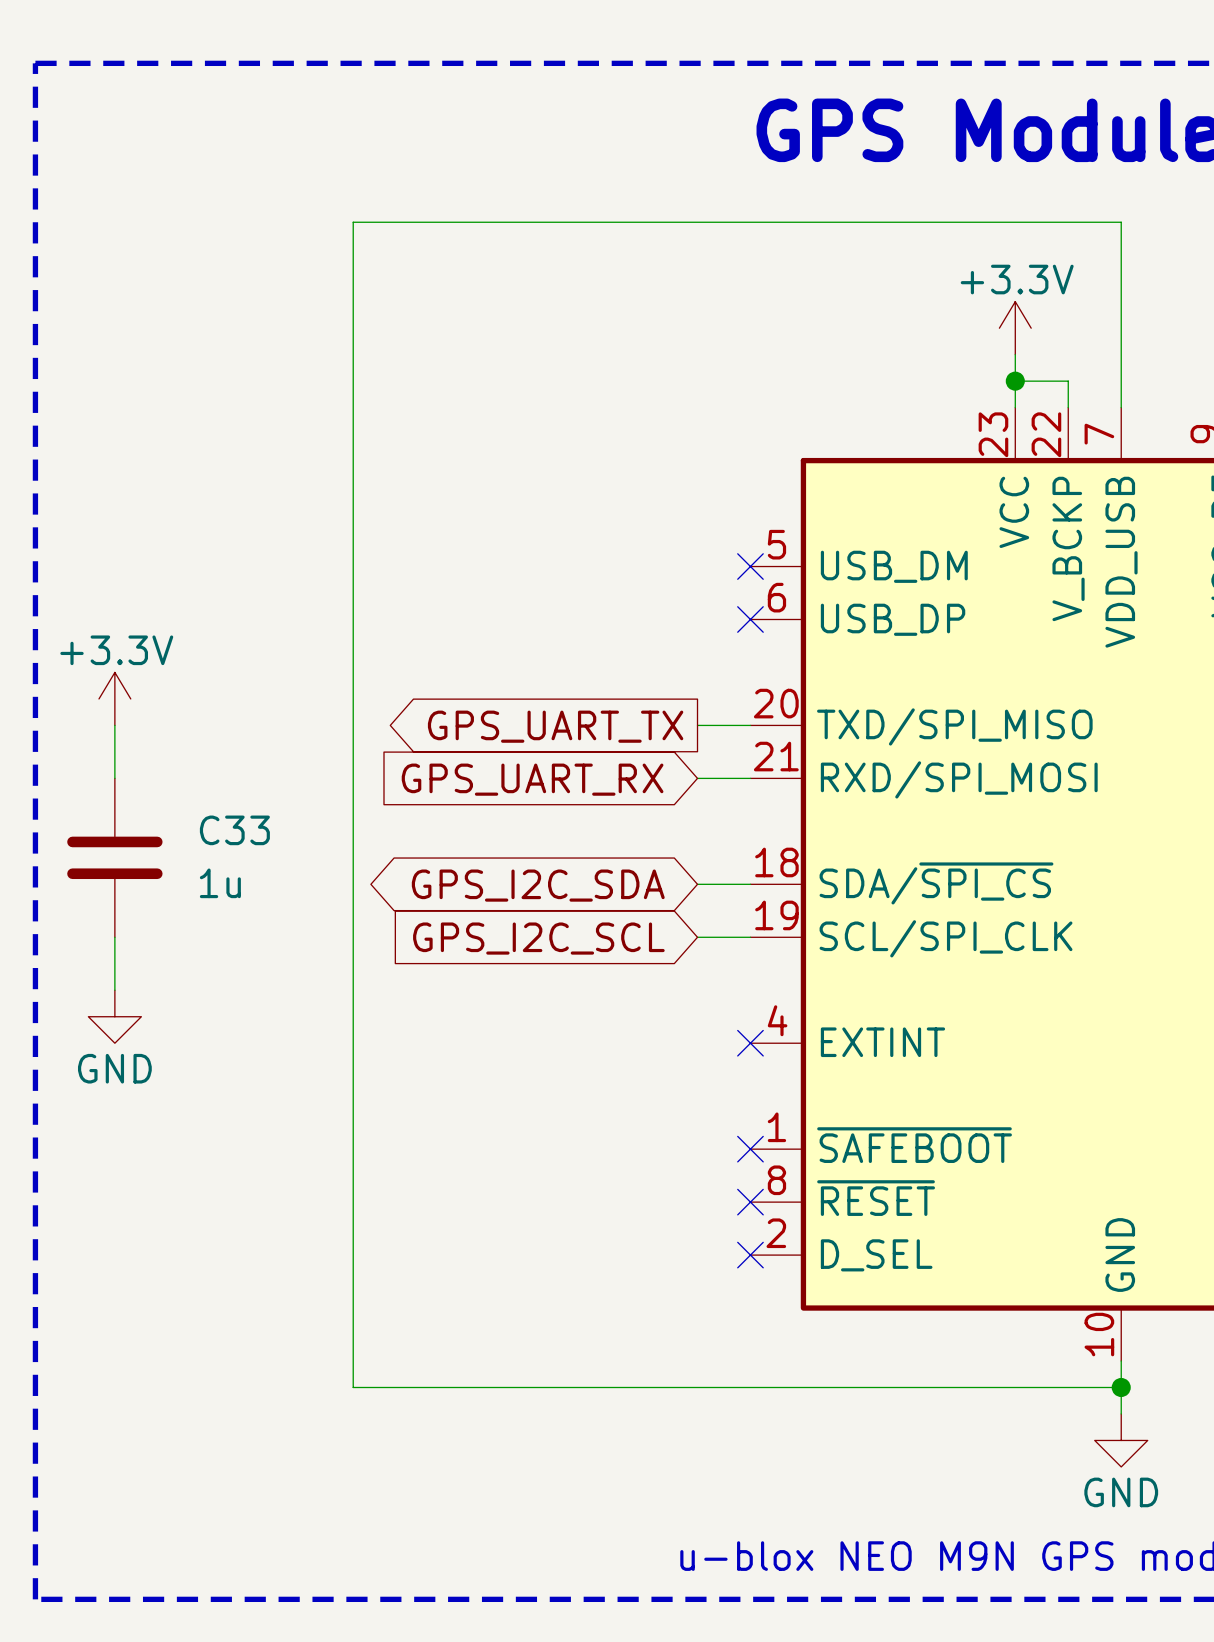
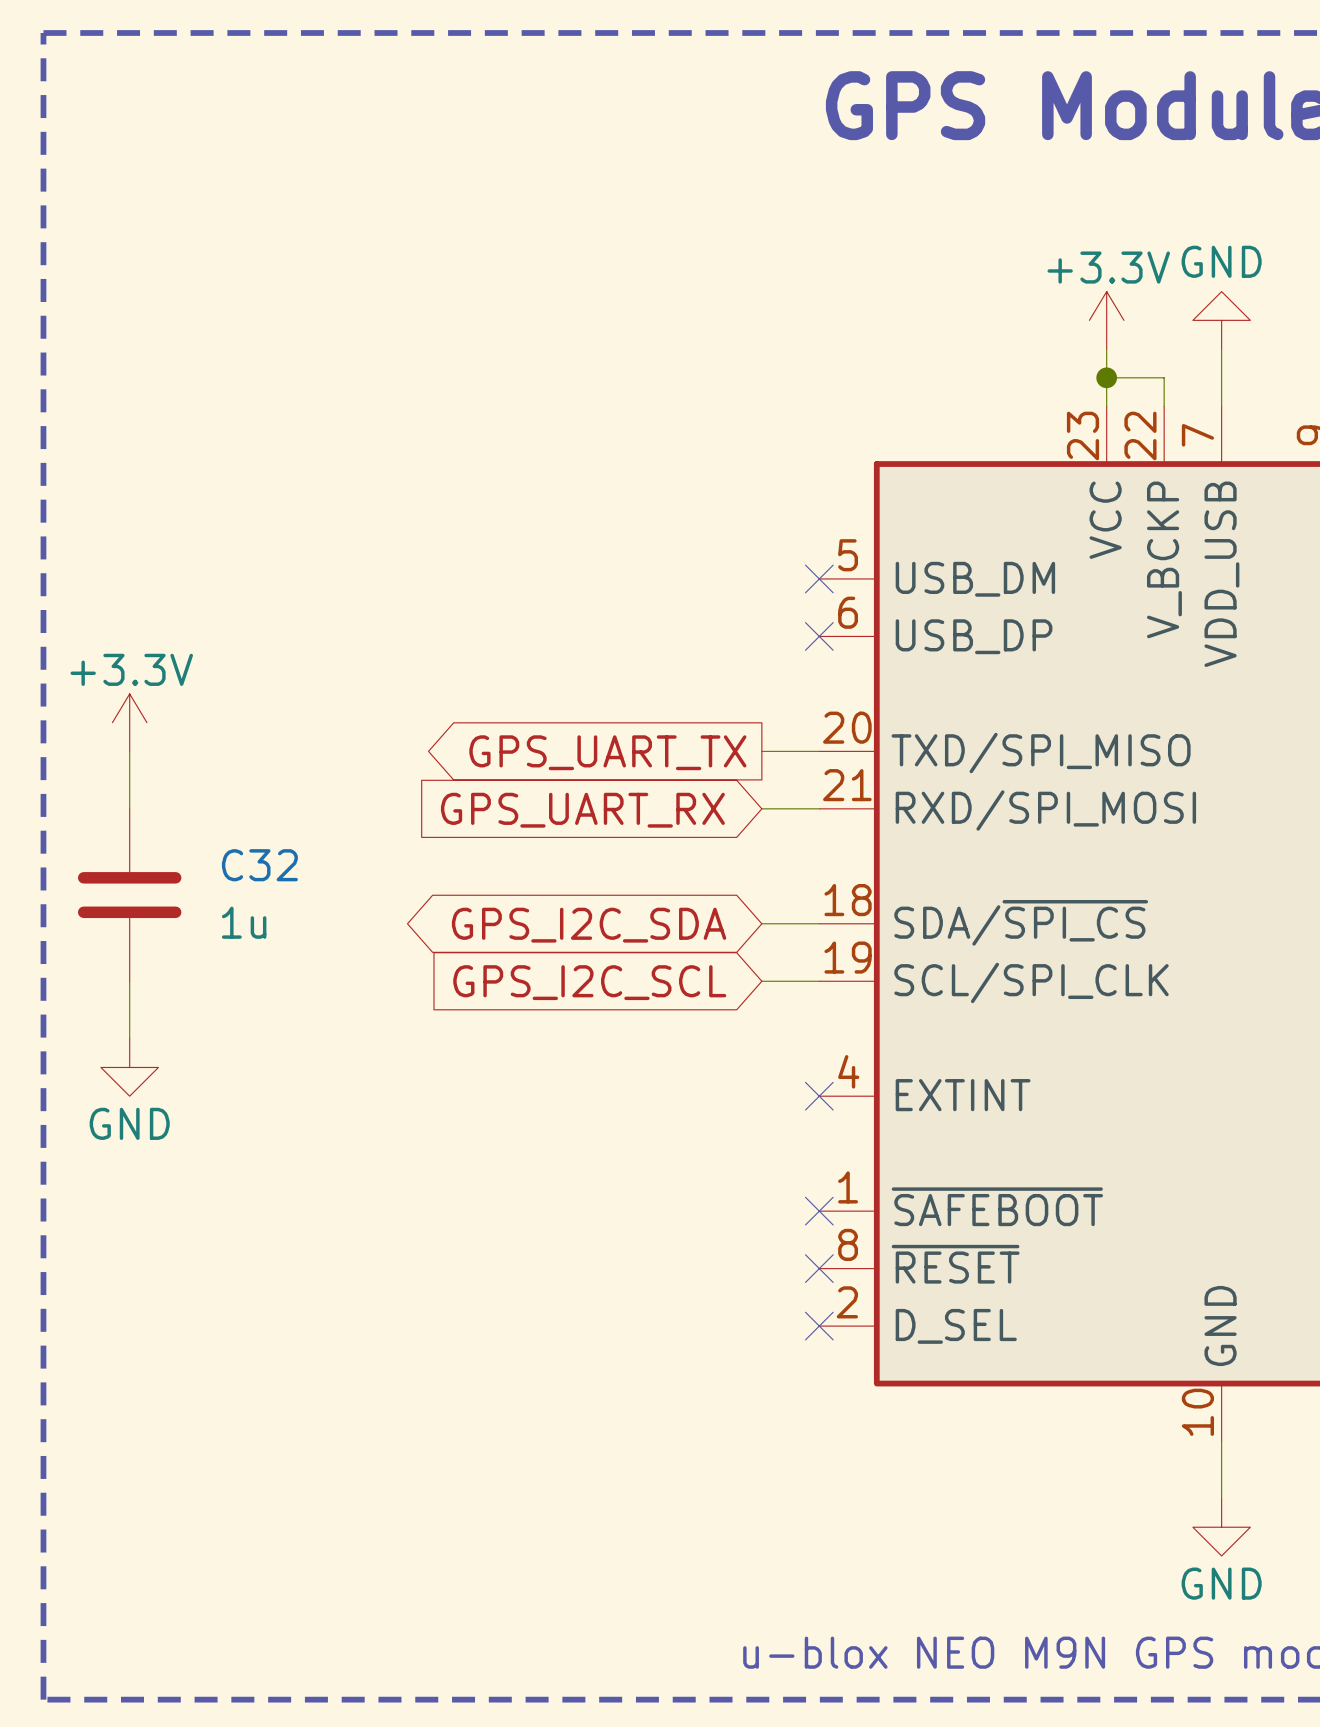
power symbol: none -> GND (1221, 320)
wire: (1121, 354) (1121, 222) (353, 222) (353, 1387) (1121, 1387) -> none
C33 name: C33 (234, 830) -> C32 (259, 865)
junction: (1121, 1387) -> none

